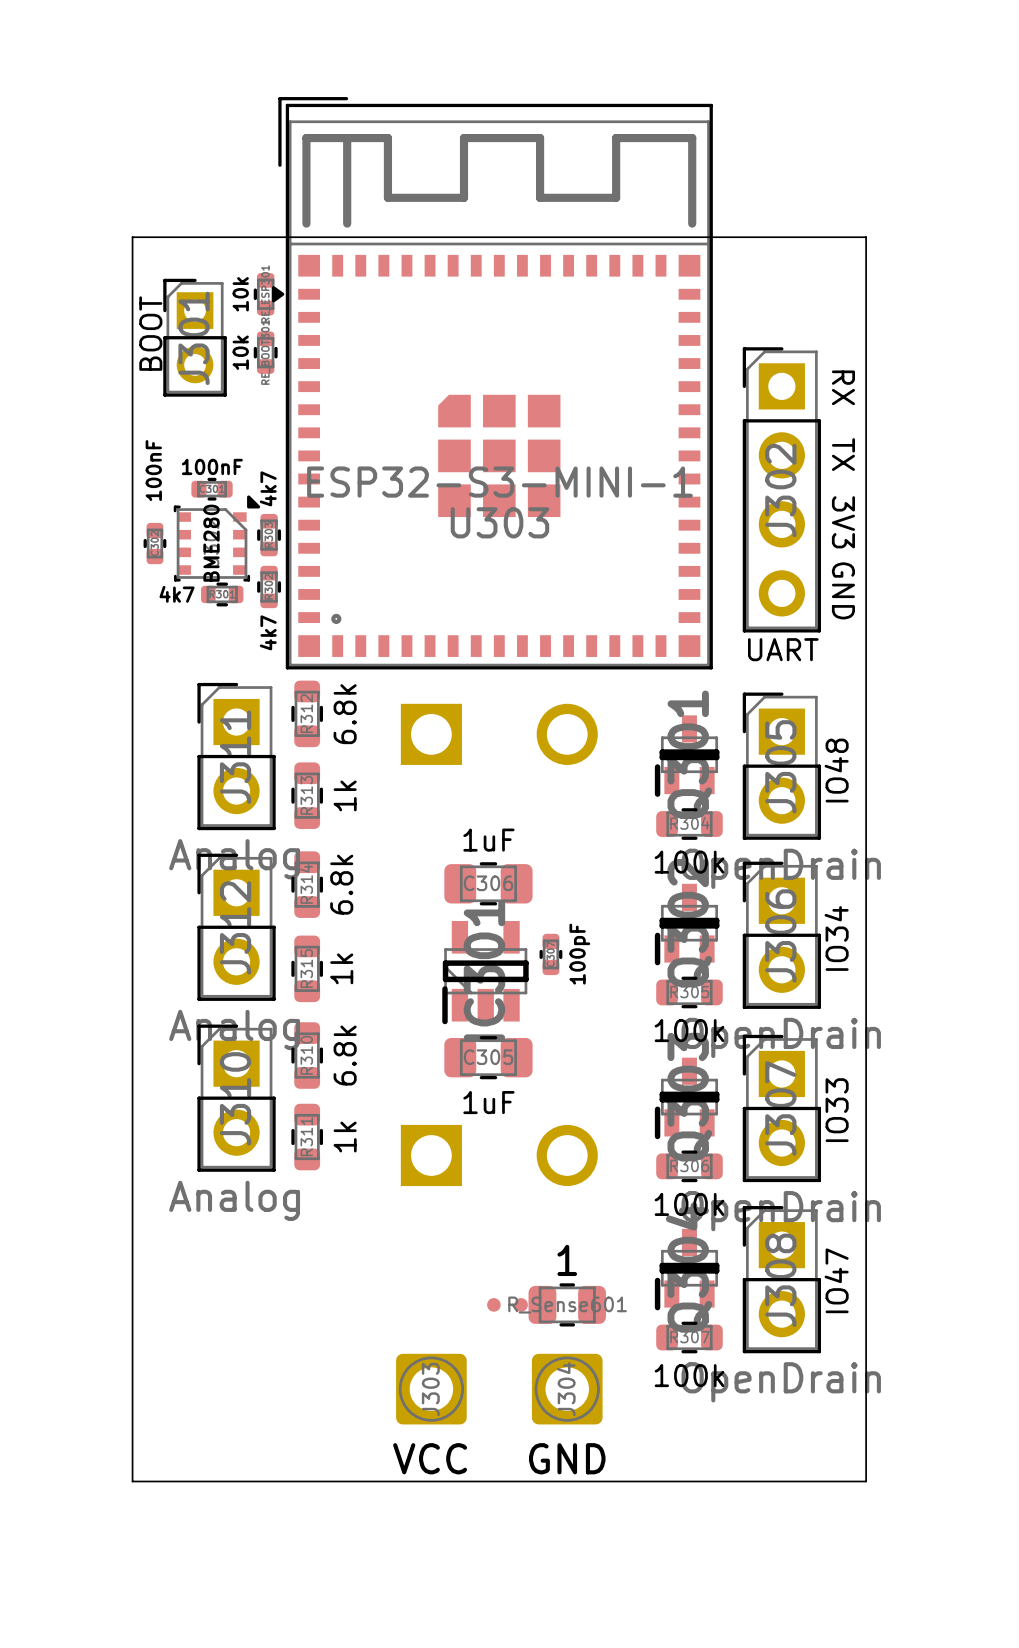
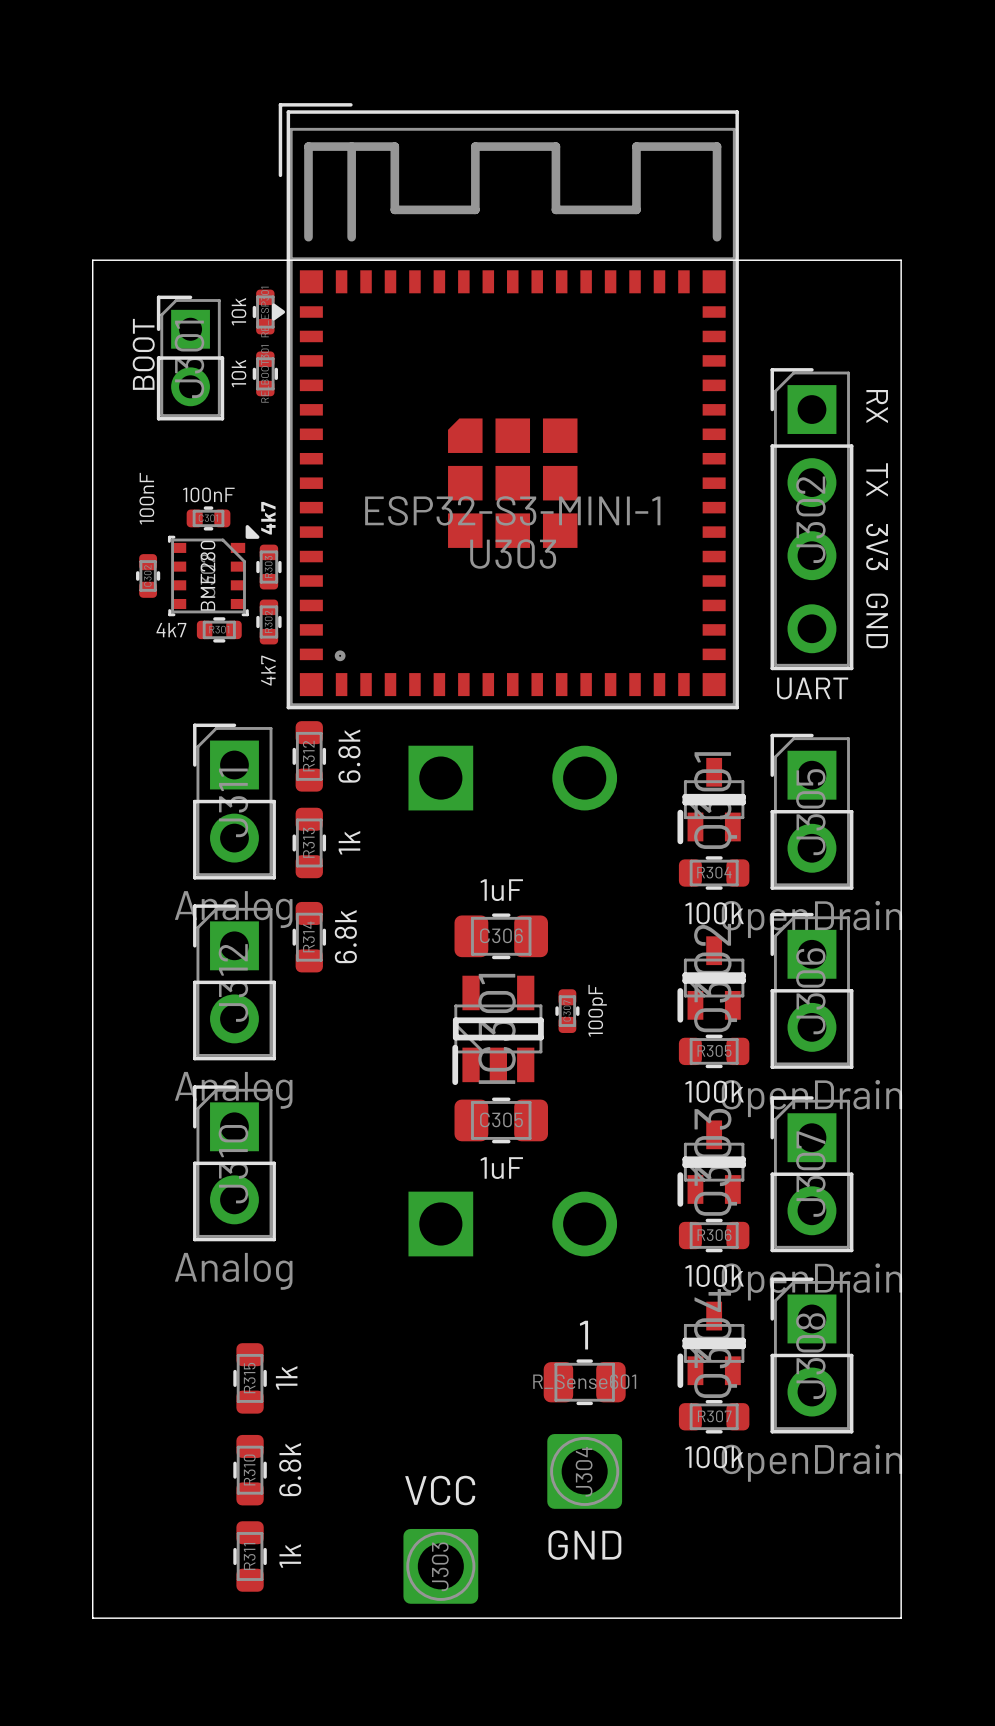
board edge: (866, 245) (866, 237) (132, 237) (132, 1481) (866, 1481) -> (901, 260) (92, 260) (92, 1618) (901, 1618) (901, 1569)
text: IO48 (836, 770) -> none
text: IO34 (836, 938) -> none
R315 position: (307, 968) -> (250, 1378)
R310 position: (307, 1055) -> (250, 1470)
text: IO33 (837, 1110) -> none
R311 position: (307, 1137) -> (250, 1556)
text: IO47 (836, 1280) -> none
part: (507, 1304) -> none
J303 position: (431, 1389) -> (440, 1566)
J303 value position: VCC (430, 1458) -> VCC (440, 1490)

